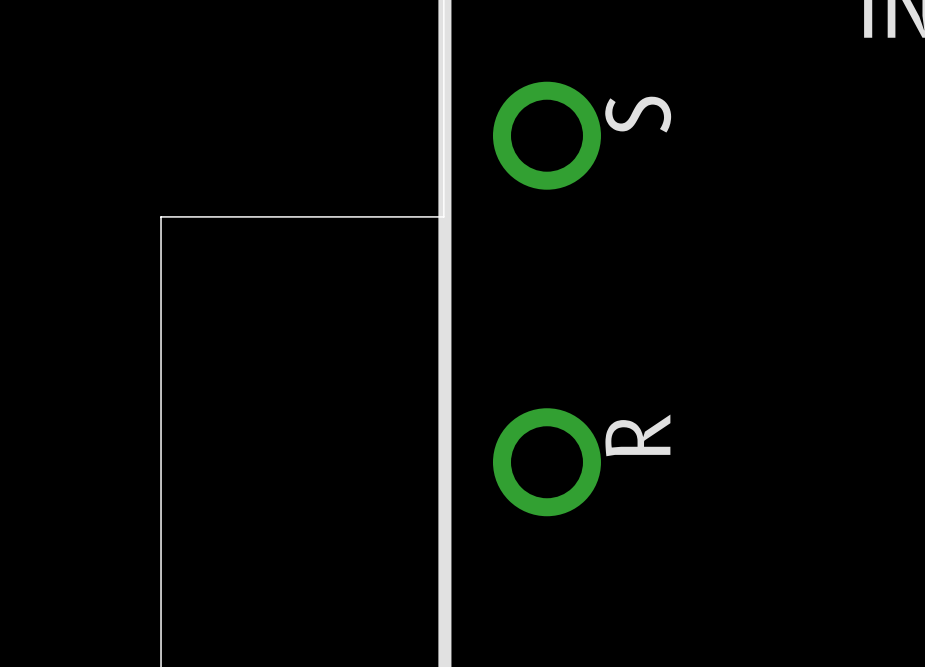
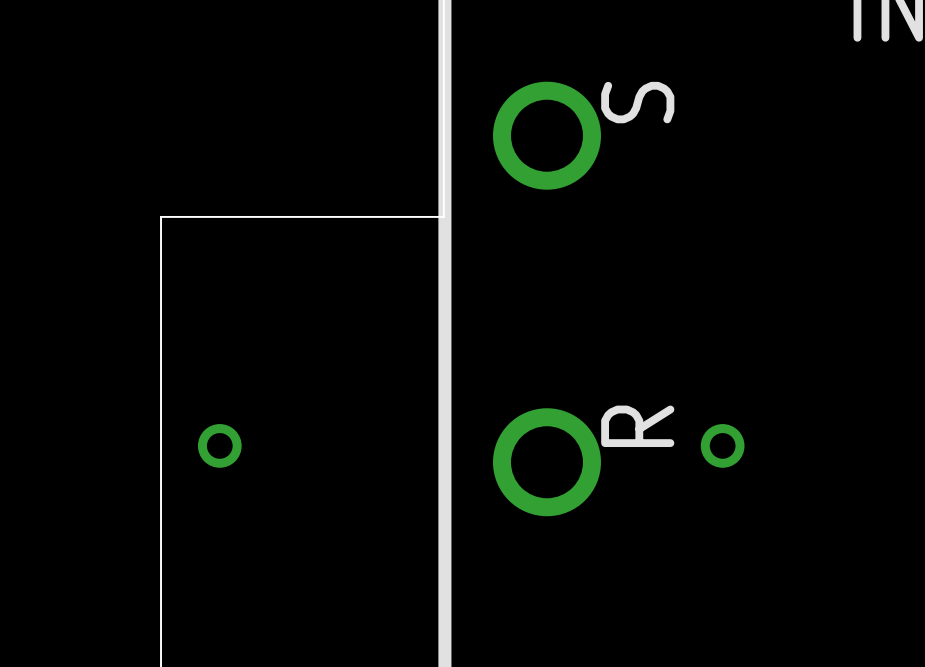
via: none -> (219, 445)
via: none -> (722, 445)

